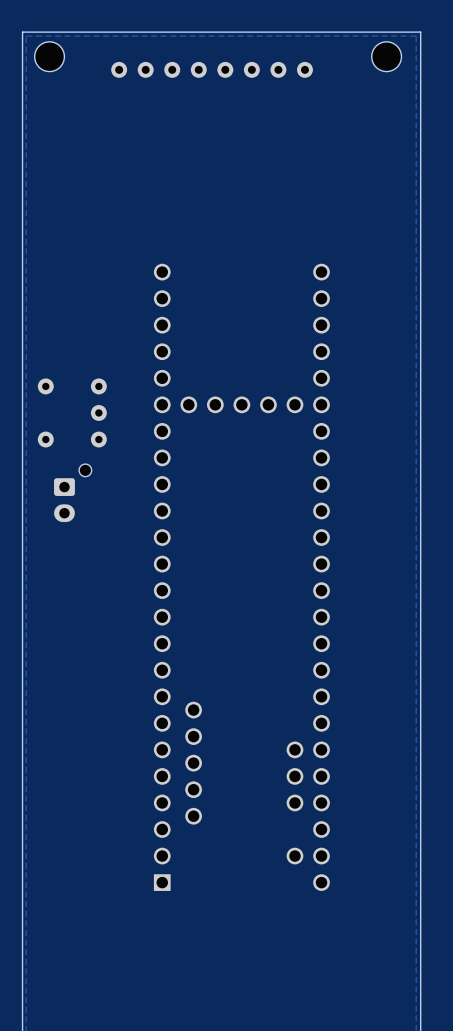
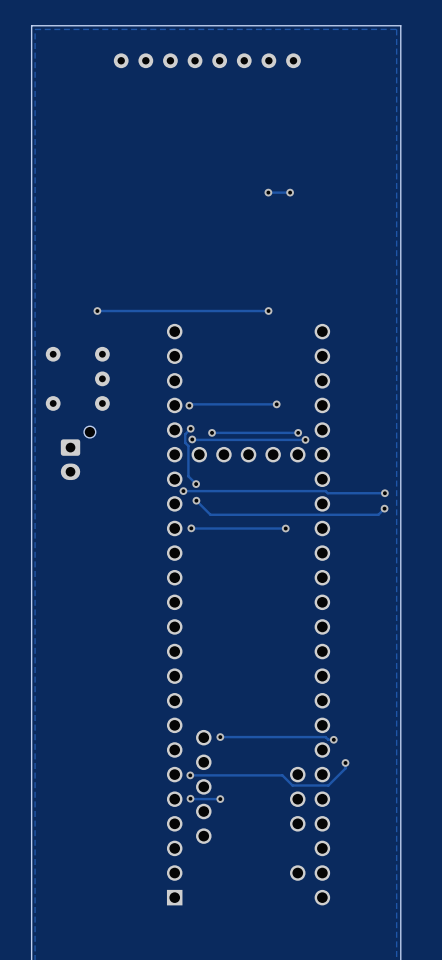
part: (49, 56) -> none
part: (386, 56) -> none
via: none -> (268, 192)
track: none -> (290, 192) (268, 192)
via: none -> (290, 192)
via: none -> (97, 311)
track: none -> (268, 311) (97, 311)
via: none -> (268, 311)
track: none -> (276, 404) (189, 405)
via: none -> (276, 404)
via: none -> (189, 405)
track: none -> (190, 428) (185, 434) (185, 442) (188, 446) (188, 476) (196, 484)
via: none -> (190, 428)
via: none -> (212, 432)
track: none -> (298, 432) (212, 432)
via: none -> (298, 432)
track: none -> (192, 439) (305, 439)
via: none -> (192, 439)
via: none -> (305, 439)
via: none -> (196, 484)
track: none -> (183, 491) (384, 493)
via: none -> (183, 491)
via: none -> (384, 493)
track: none -> (196, 500) (210, 514) (378, 514) (384, 508)
via: none -> (196, 500)
via: none -> (384, 508)
track: none -> (191, 528) (285, 528)
via: none -> (191, 528)
via: none -> (285, 528)
part position: (241, 577) -> (248, 614)
track: none -> (220, 737) (325, 737) (328, 739) (333, 739)
via: none -> (220, 737)
via: none -> (333, 739)
track: none -> (345, 762) (345, 768) (328, 785) (292, 785) (282, 775) (190, 775)
via: none -> (345, 762)
via: none -> (190, 775)
track: none -> (190, 798) (220, 799)
via: none -> (190, 798)
via: none -> (220, 799)

